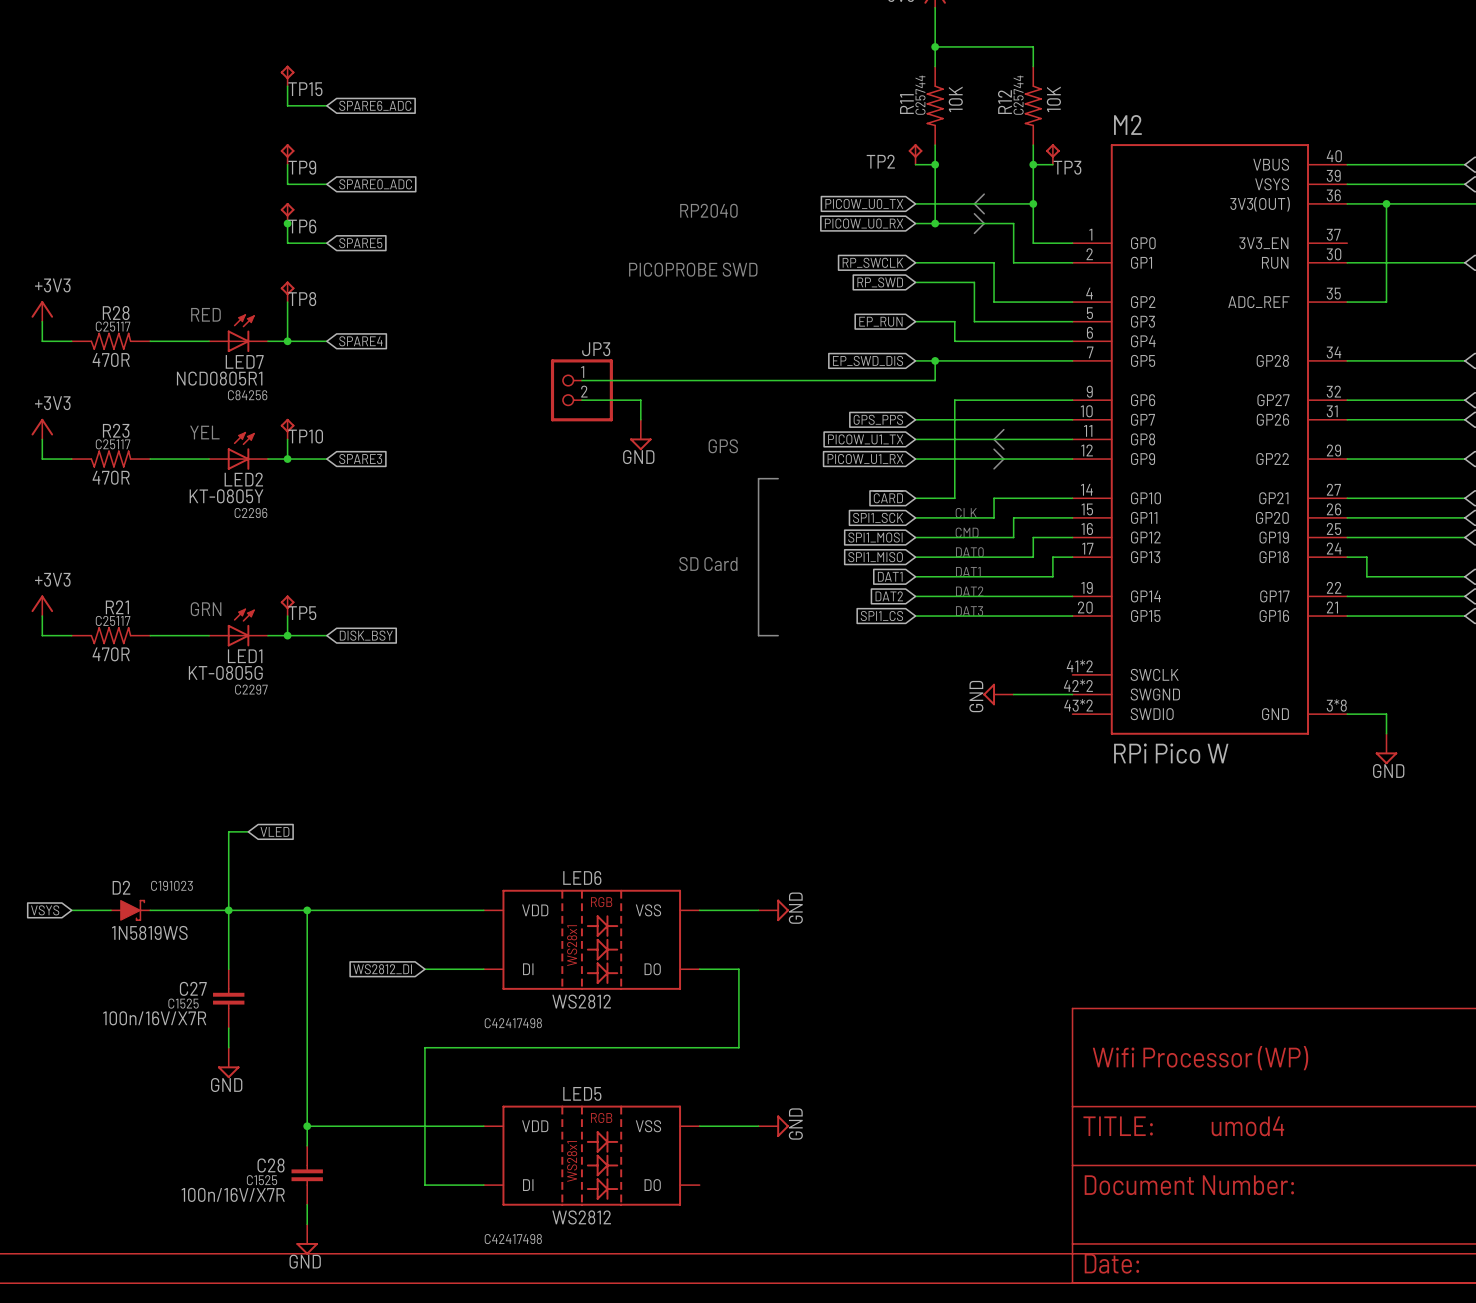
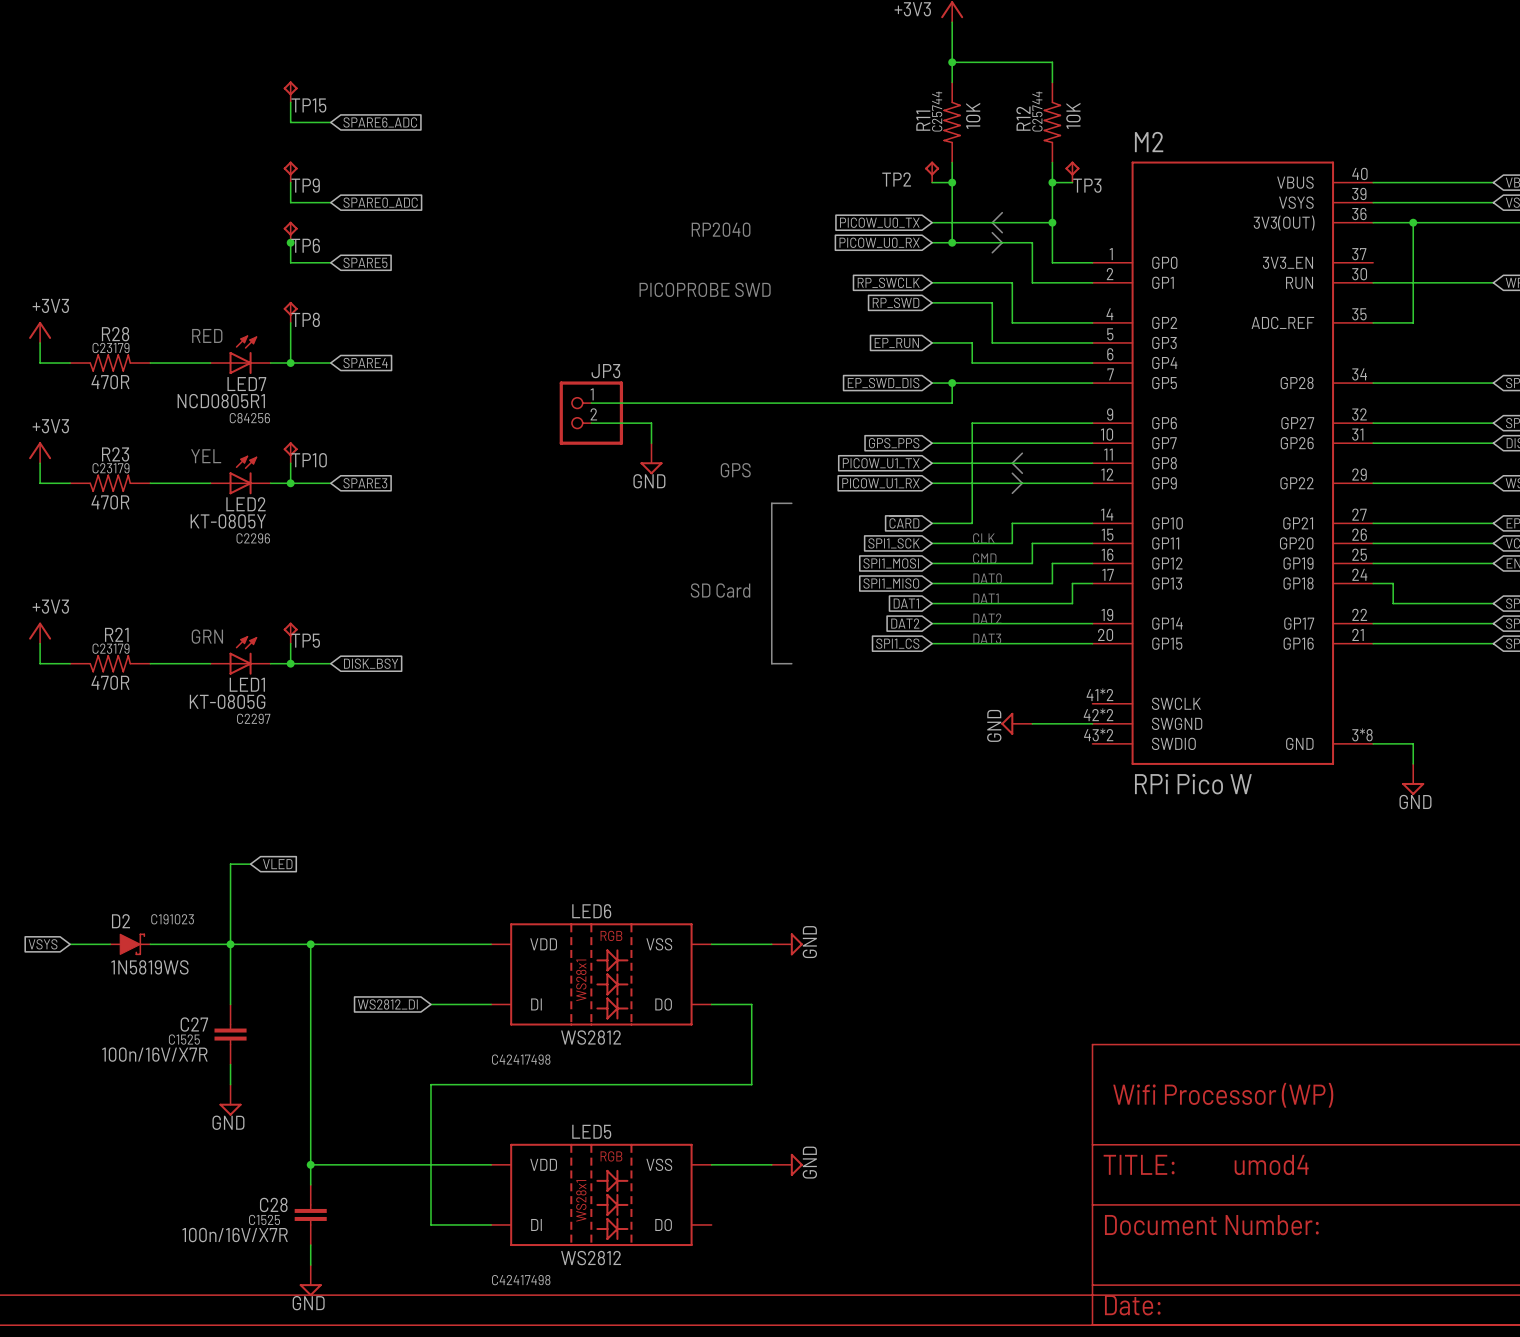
R28 text: C25117 (113, 326) -> C23179 (111, 347)
R23 text: C25117 (113, 444) -> C23179 (111, 468)
R21 text: C25117 (113, 620) -> C23179 (111, 648)

